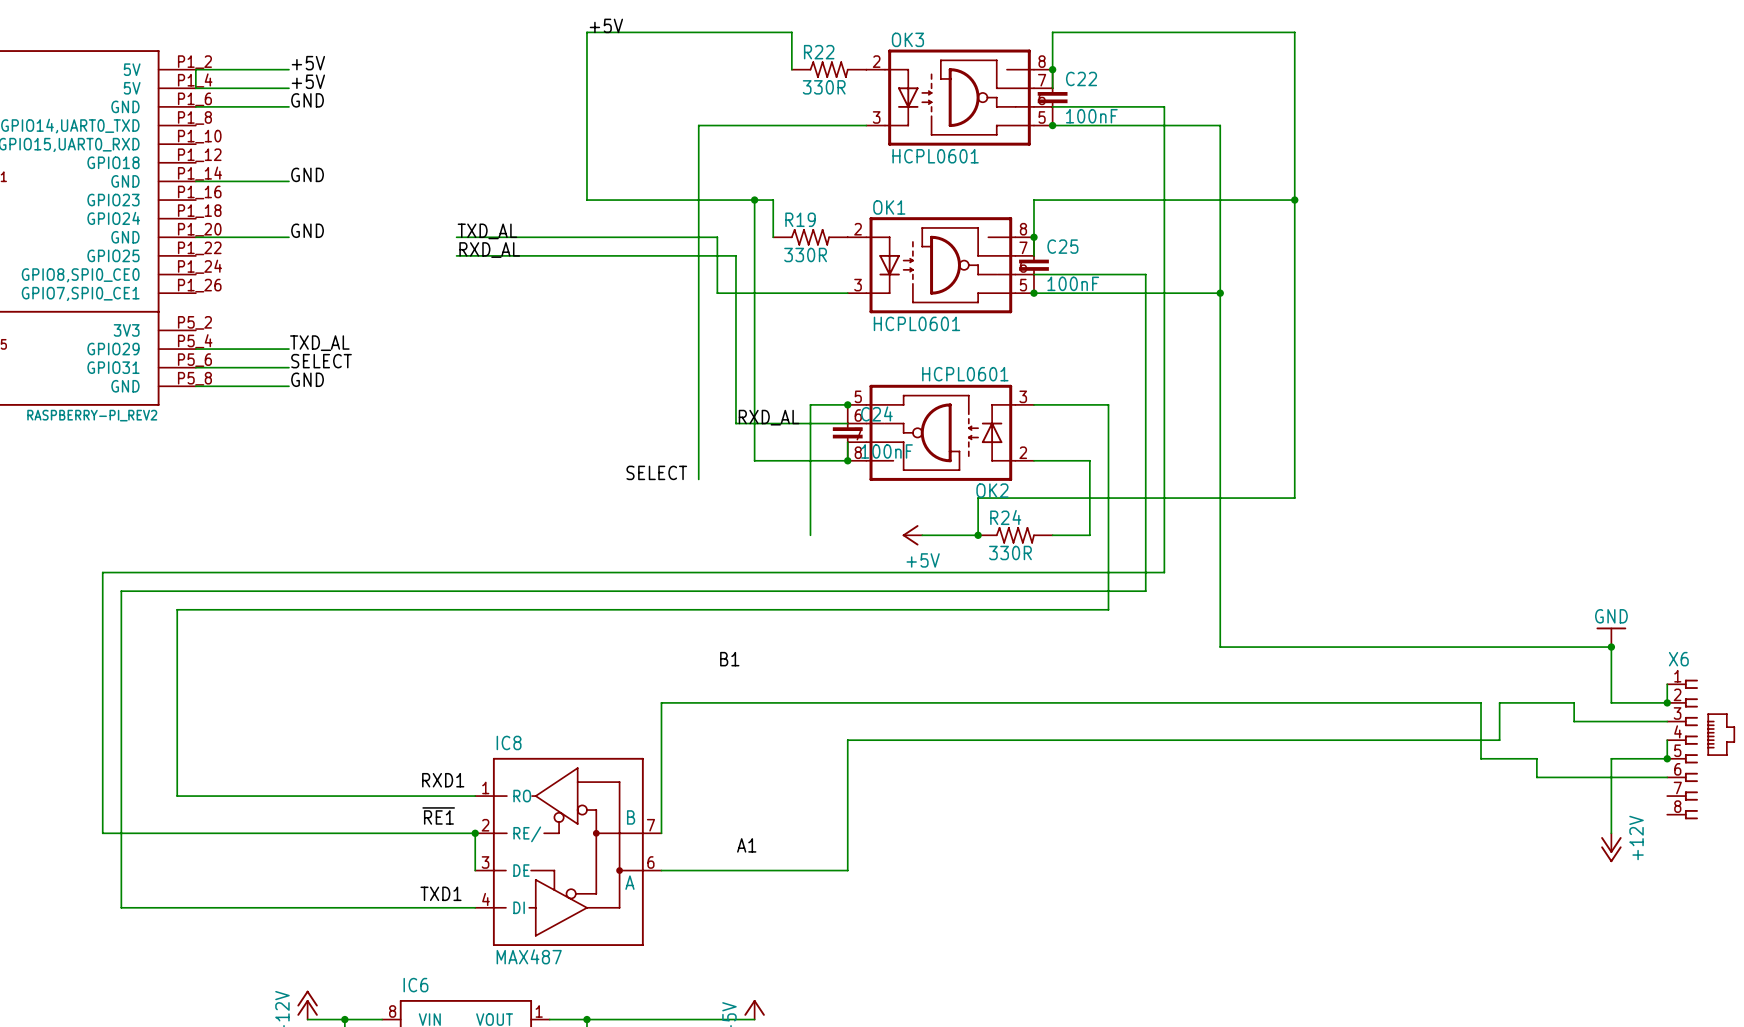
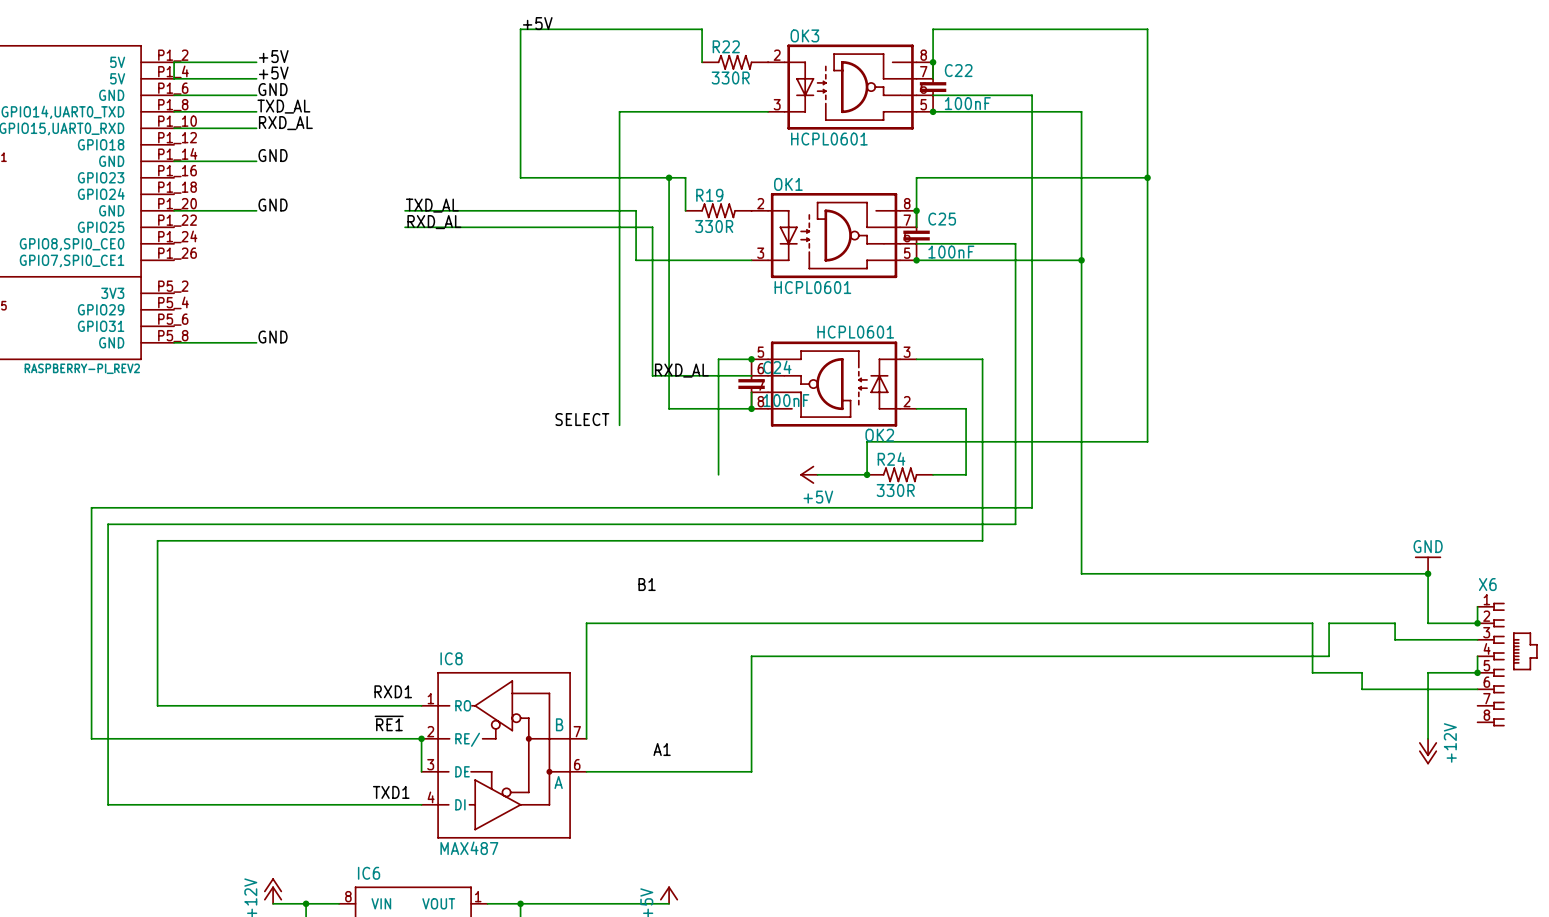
label: none -> TXD_AL (283, 106)
wire: none -> (174, 111) (256, 111)
label: none -> RXD_AL (285, 123)
wire: none -> (174, 128) (256, 128)
label: TXD_AL (319, 343) -> none
wire: (195, 349) (288, 349) -> none
label: SELECT (321, 361) -> none
wire: (195, 367) (288, 367) -> none

